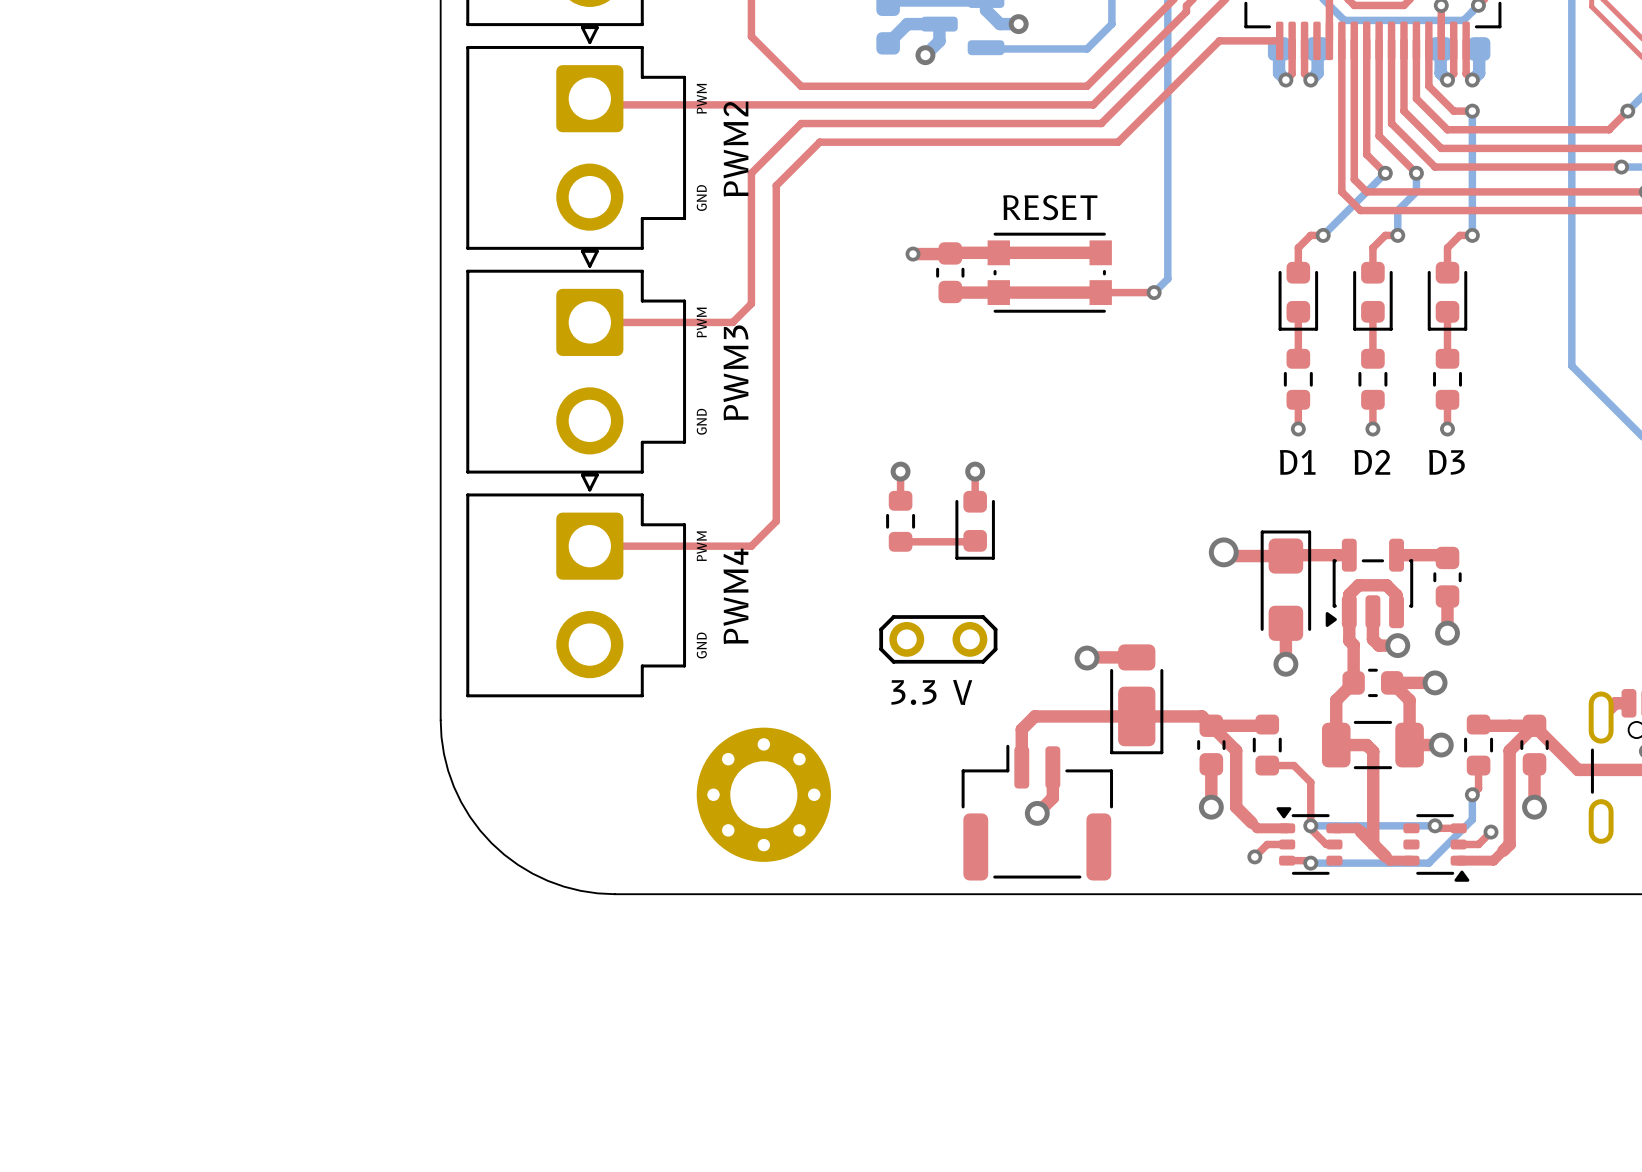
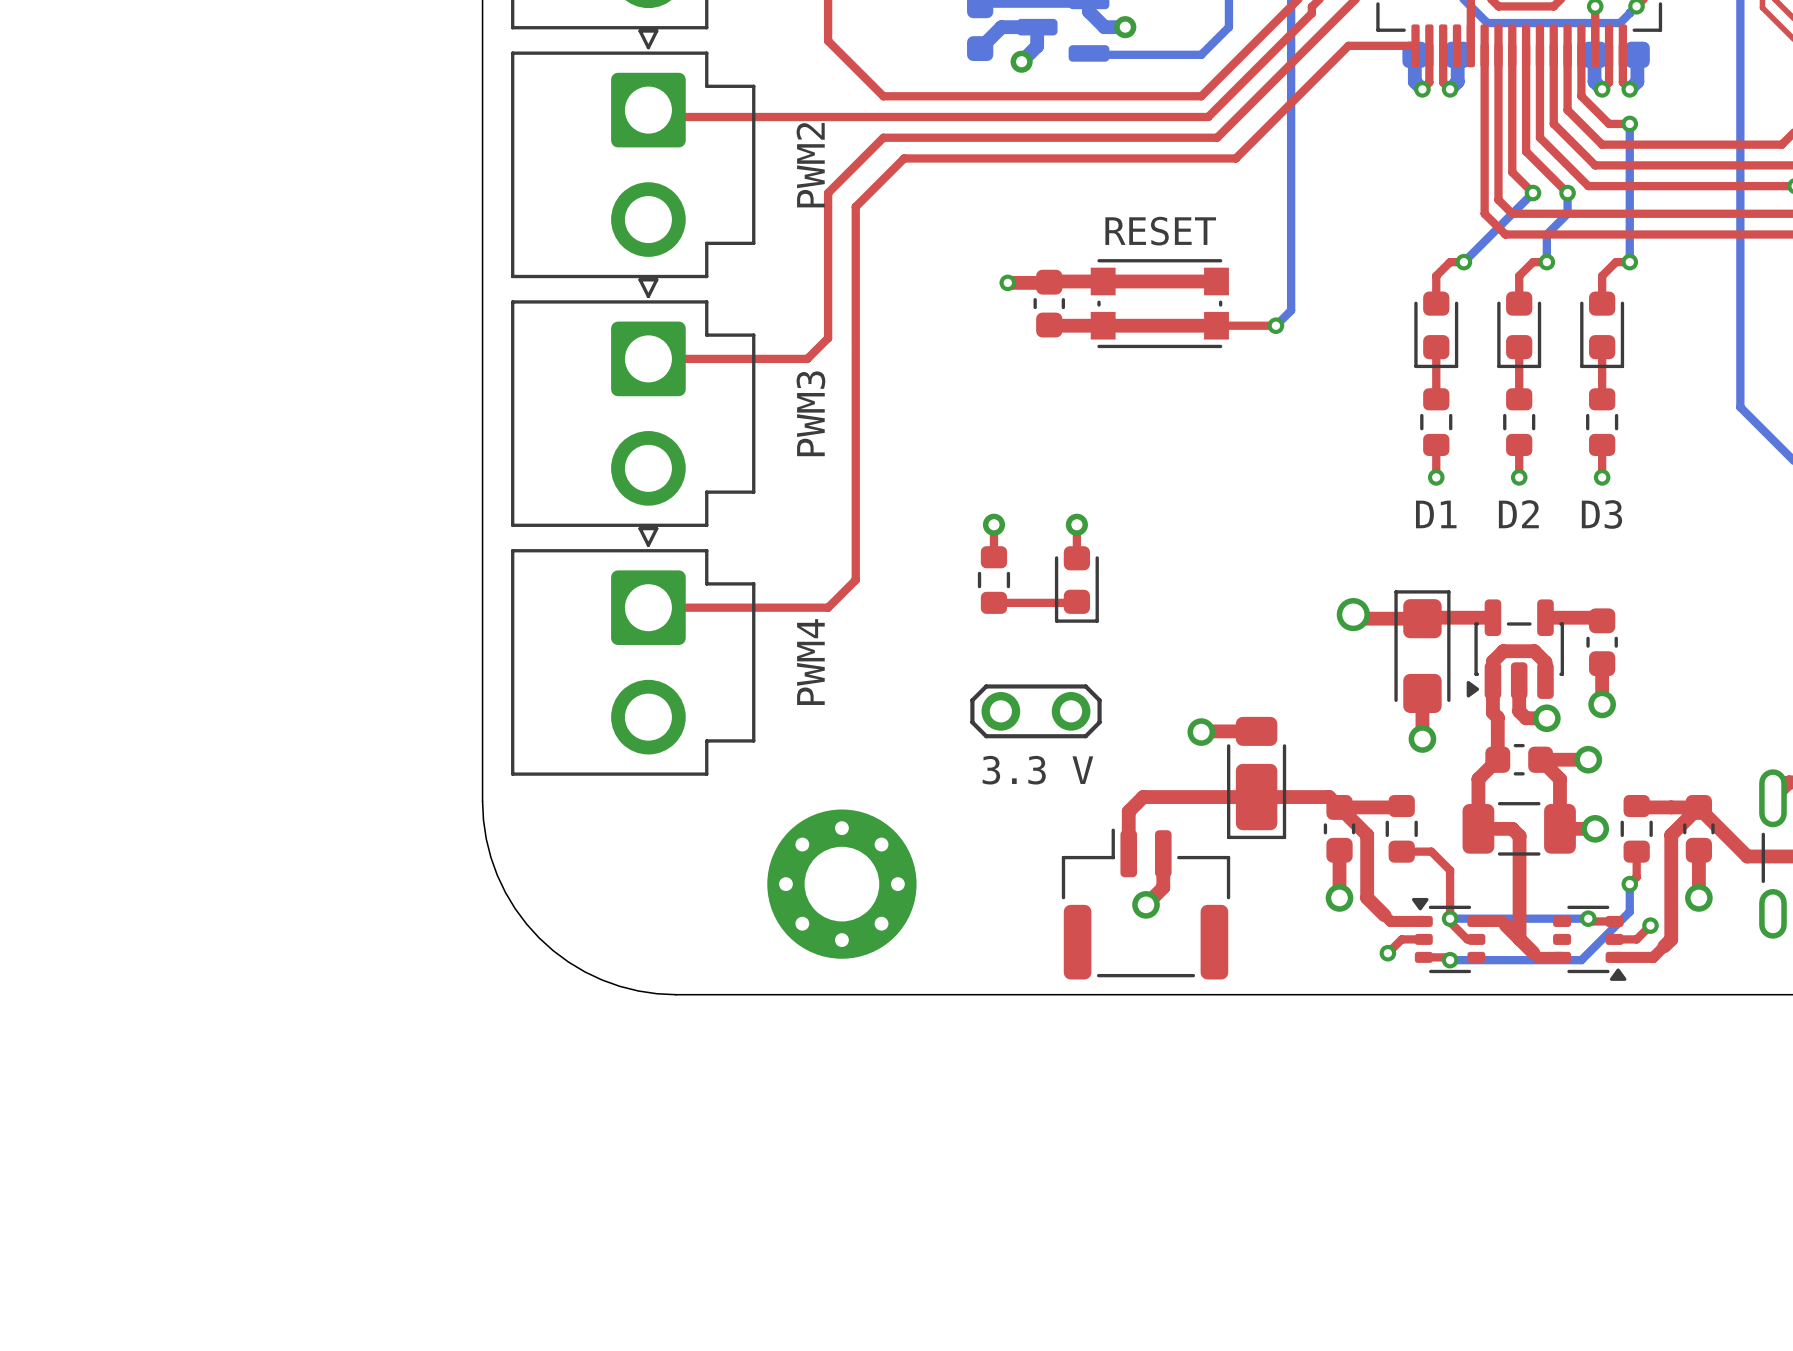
text: PWM (701, 98) -> none
text: GND (701, 198) -> none
text: PWM (701, 322) -> none
text: GND (701, 421) -> none
text: PWM (701, 546) -> none
text: GND (701, 645) -> none

